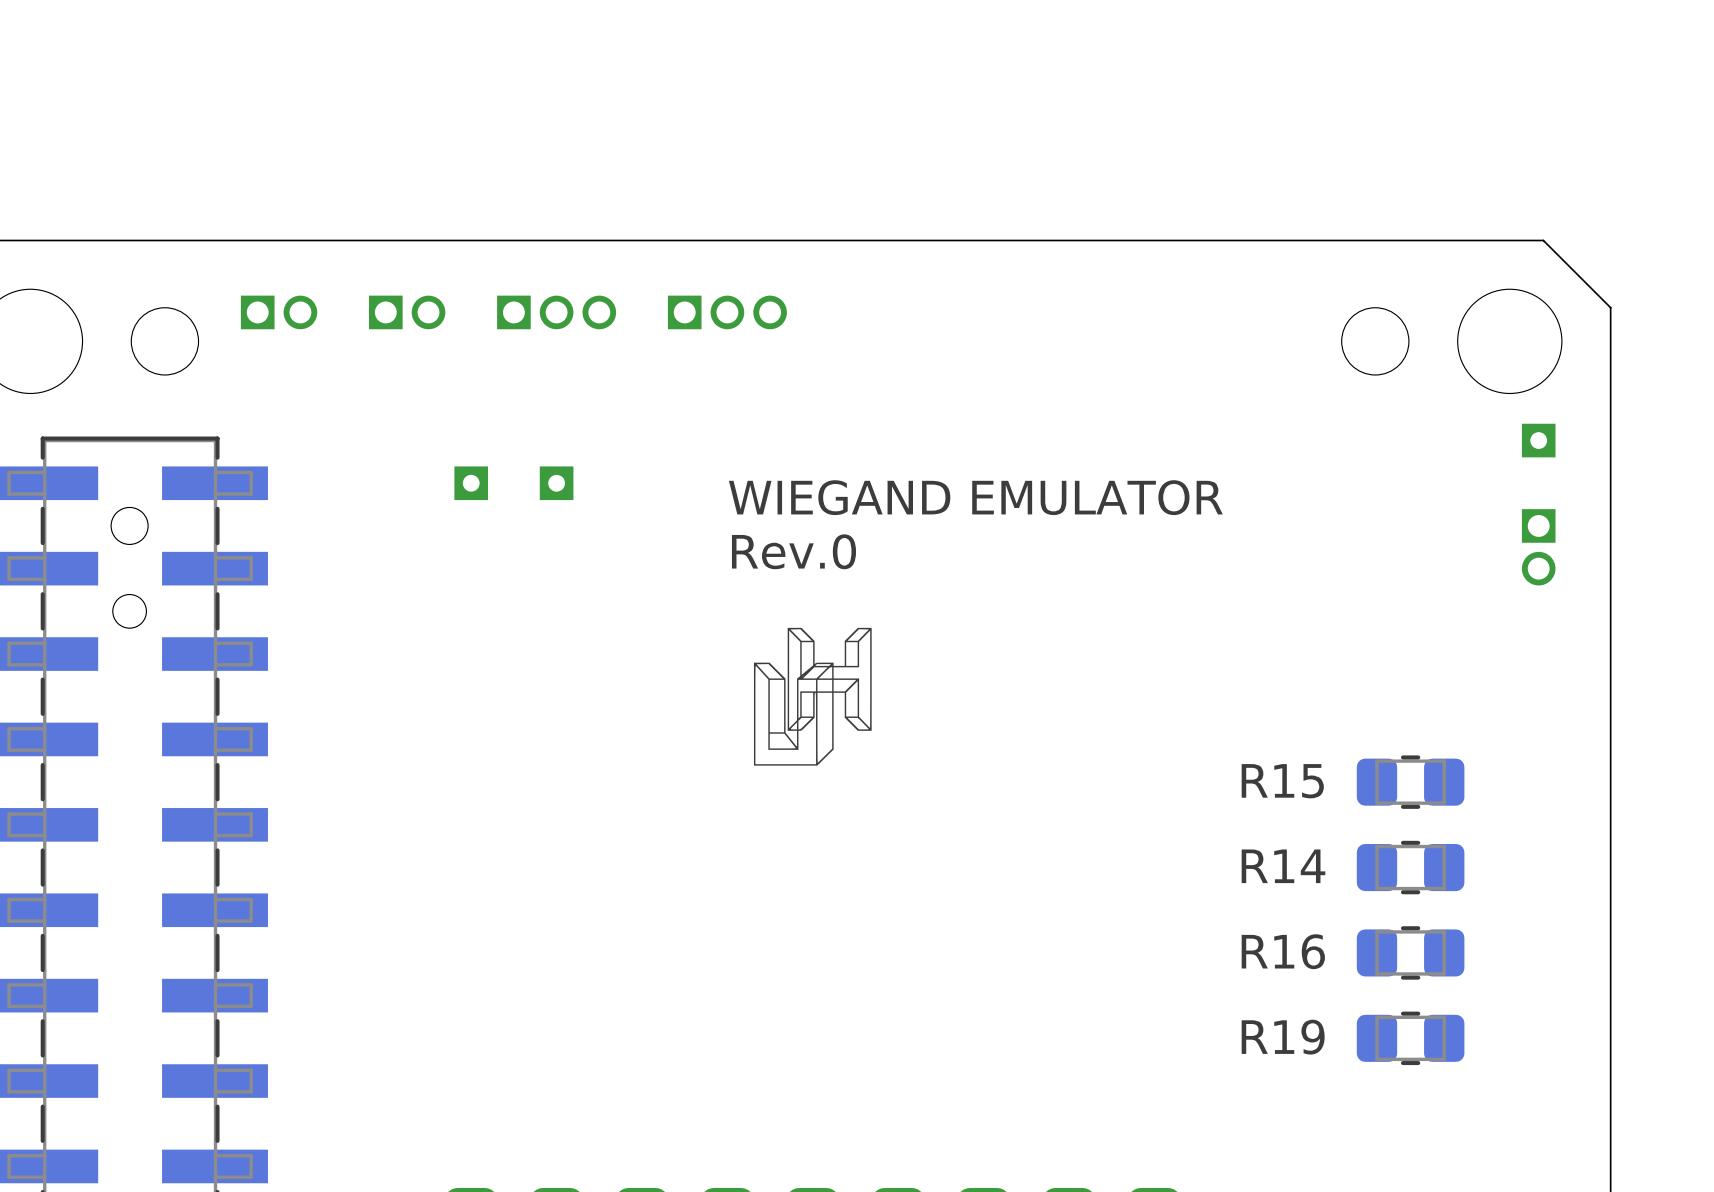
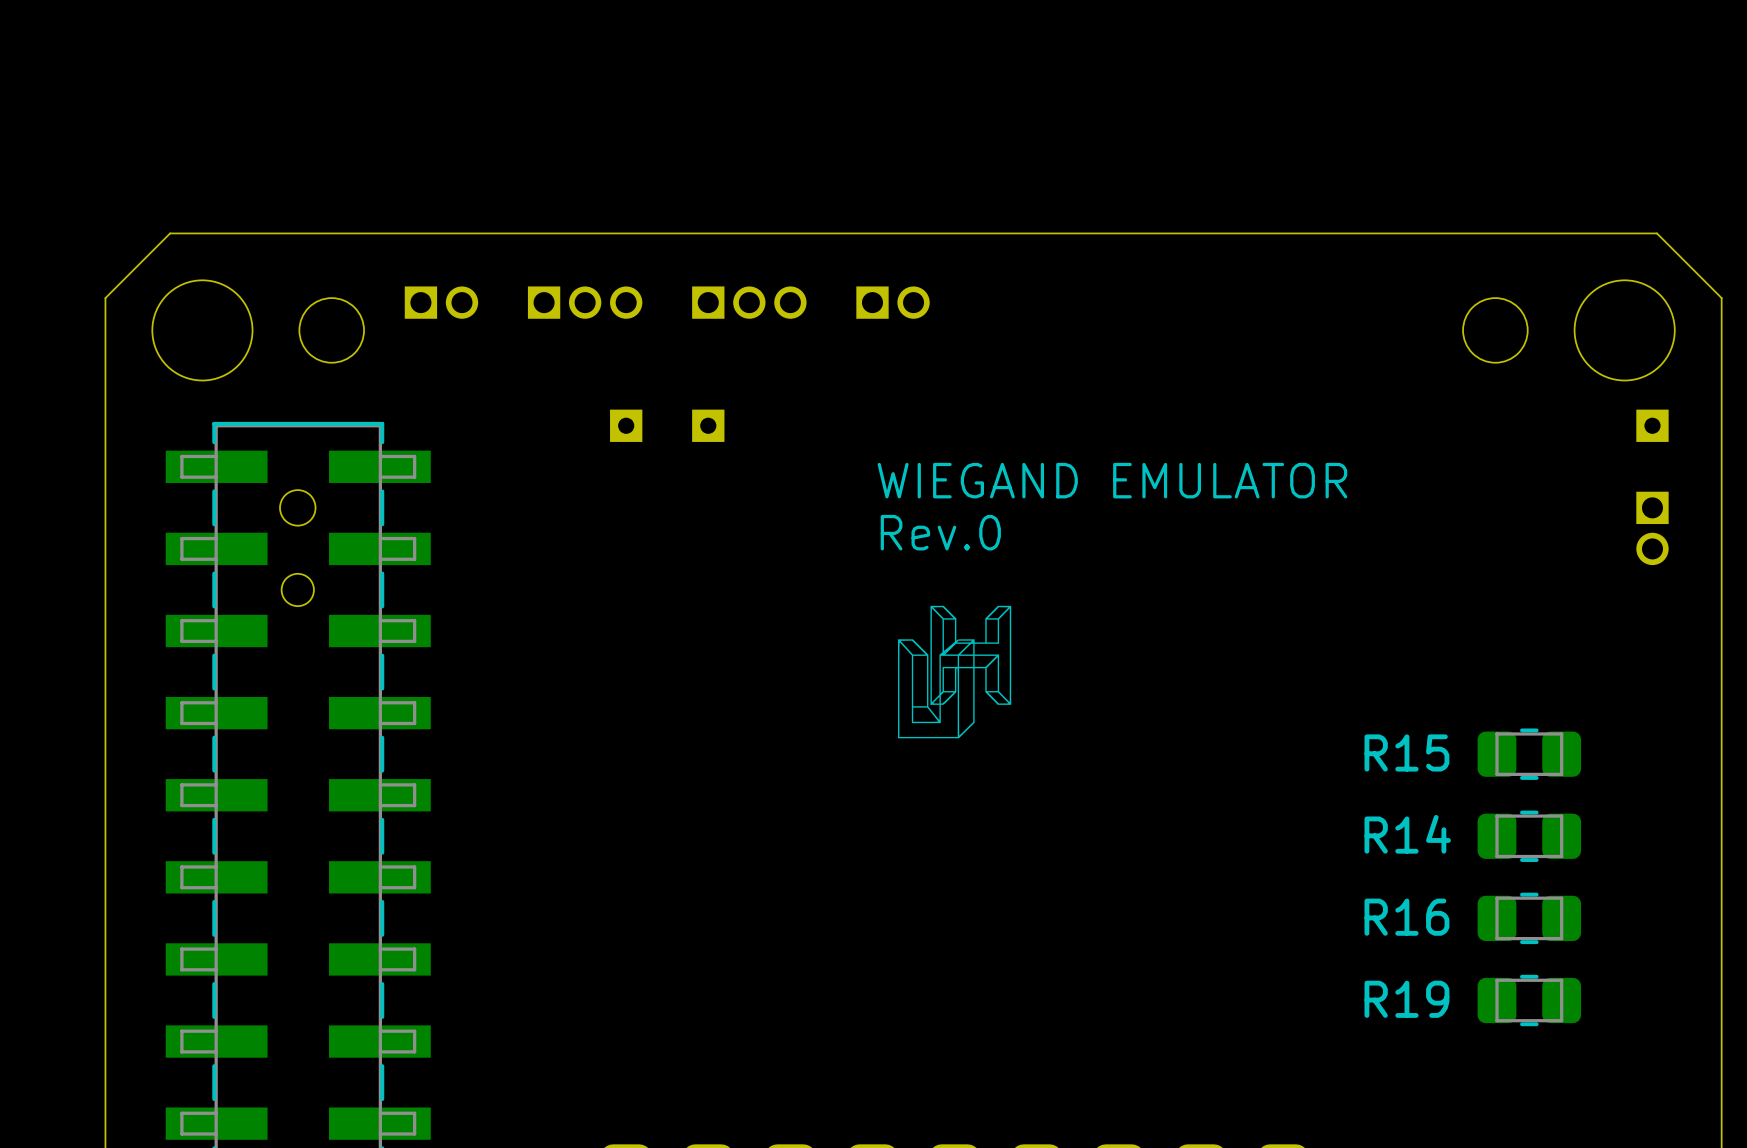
part footprint: [369, 295, 446, 330] -> [527, 286, 643, 319]
part footprint: [667, 295, 787, 330] -> [856, 286, 930, 319]
part position: (556, 312) -> (749, 302)
part position: (471, 483) -> (626, 425)
part position: (556, 483) -> (708, 425)

